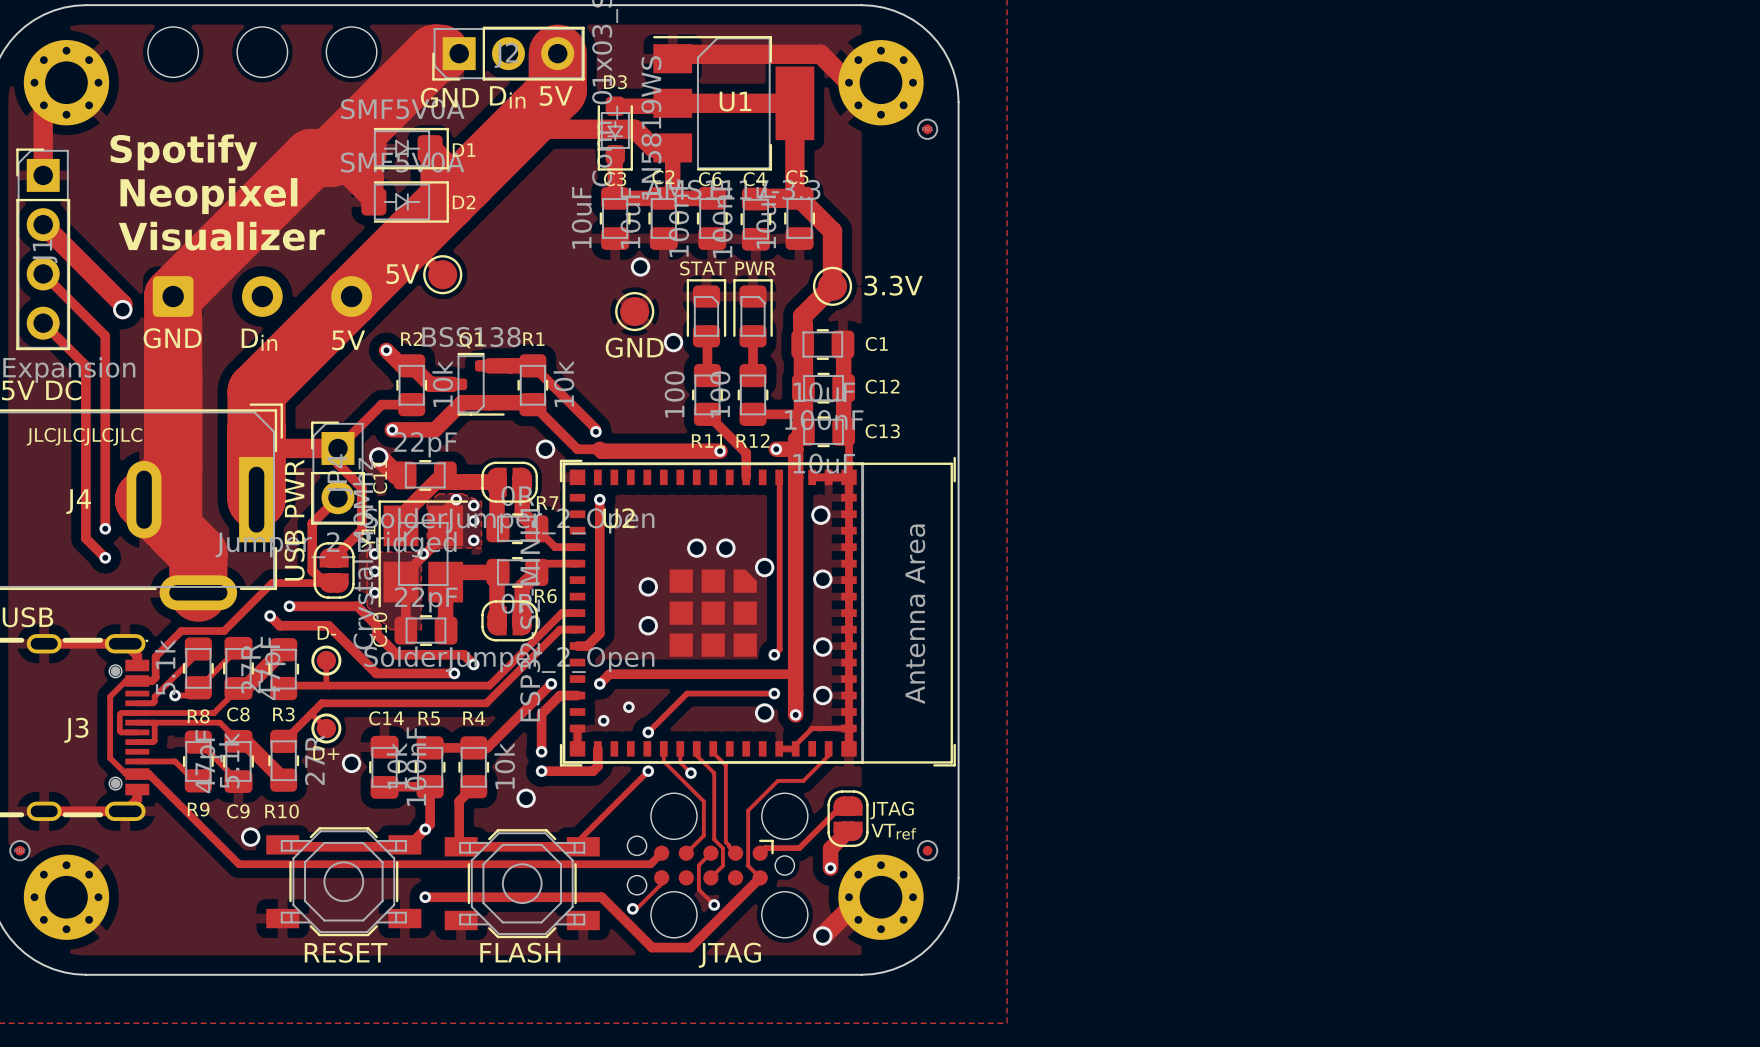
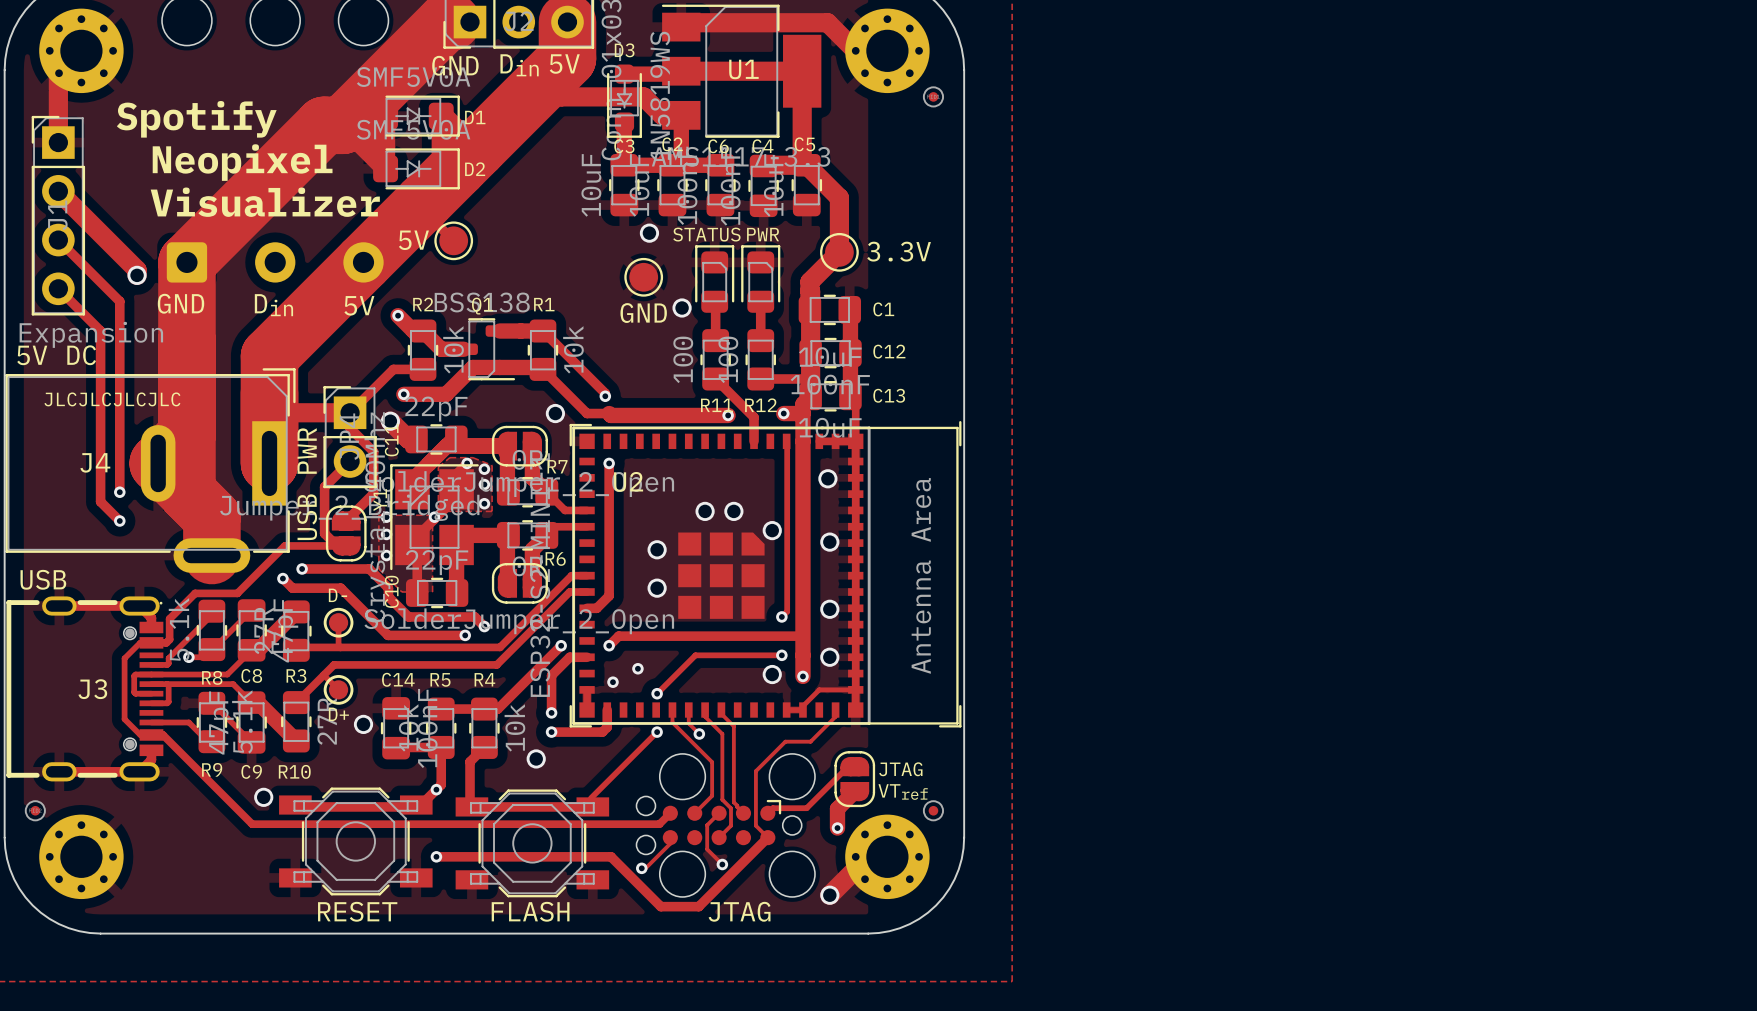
part value: STAT (703, 268) -> STATUS (706, 234)

